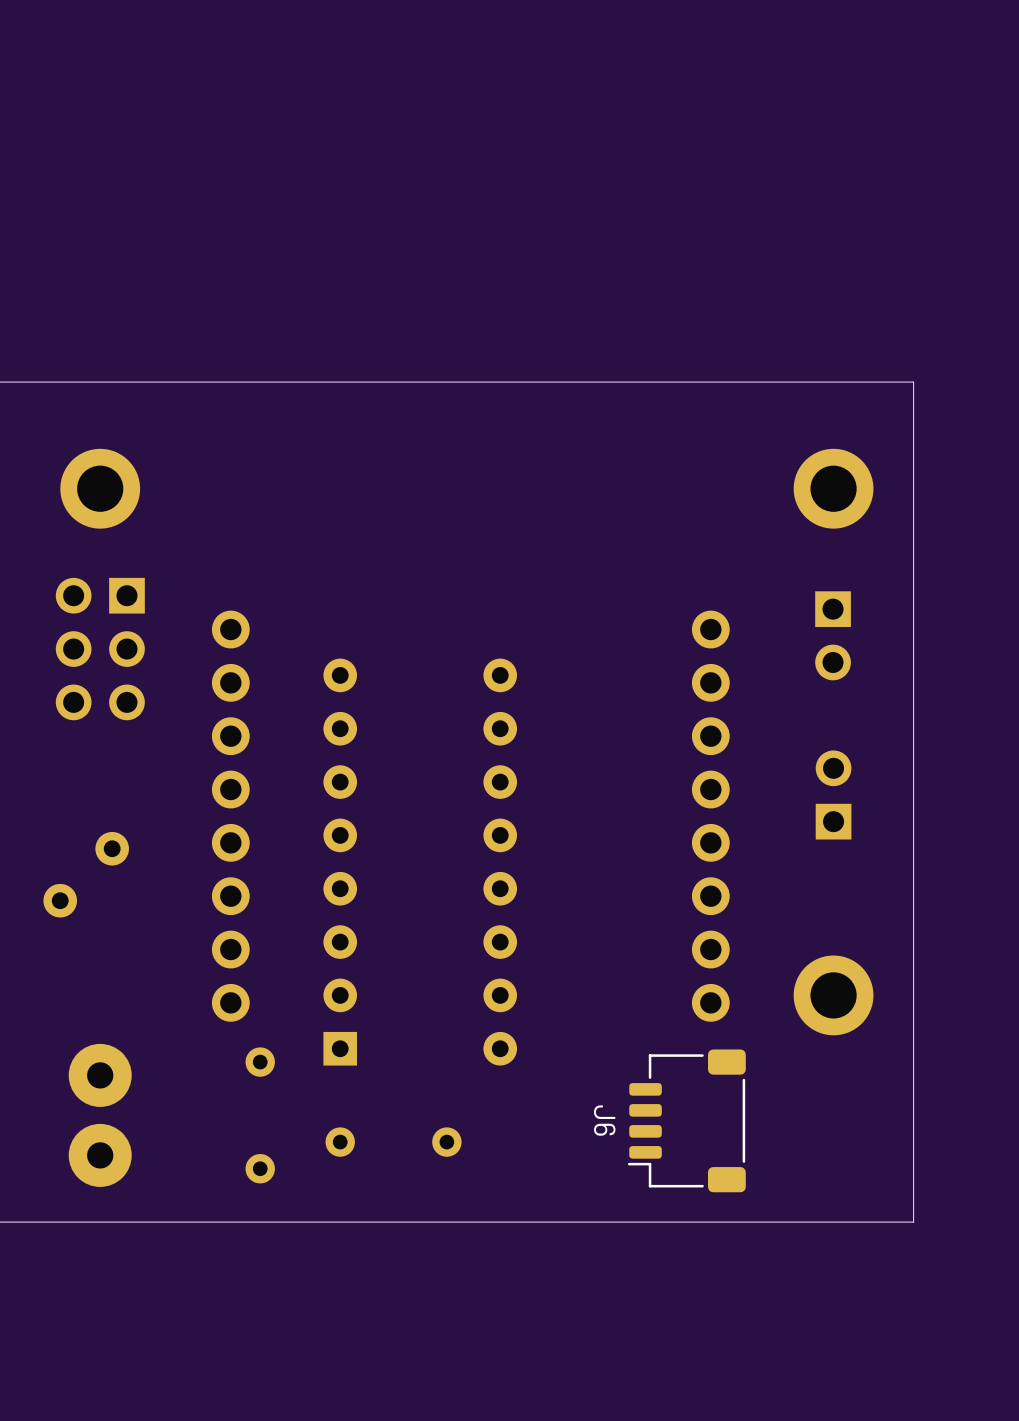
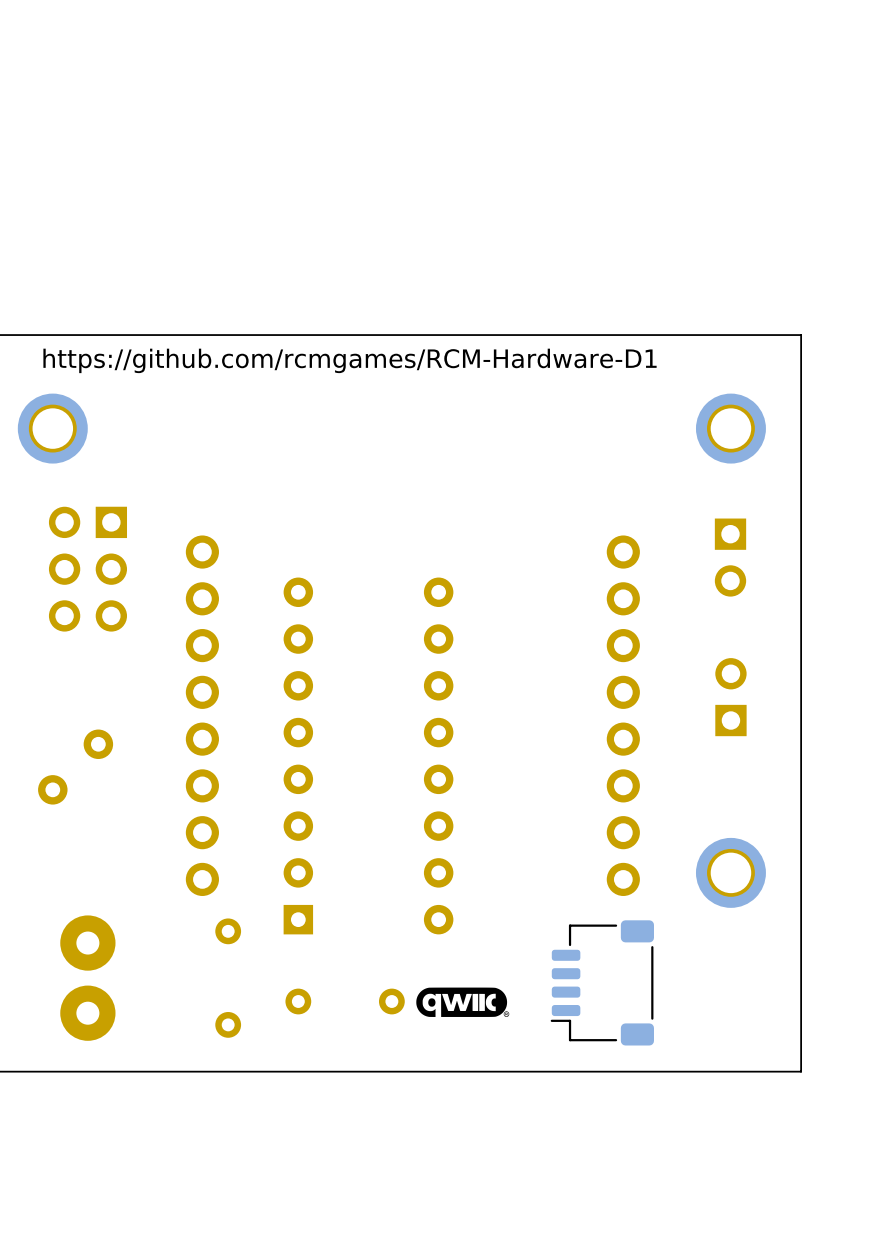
text: none -> https://github.com/rcmgames/RCM-Hardware-D1 (350, 360)
part position: (100, 488) -> (52, 428)
J6 name: J6 (604, 1120) -> none
drawing: none -> [416, 987, 510, 1017]

